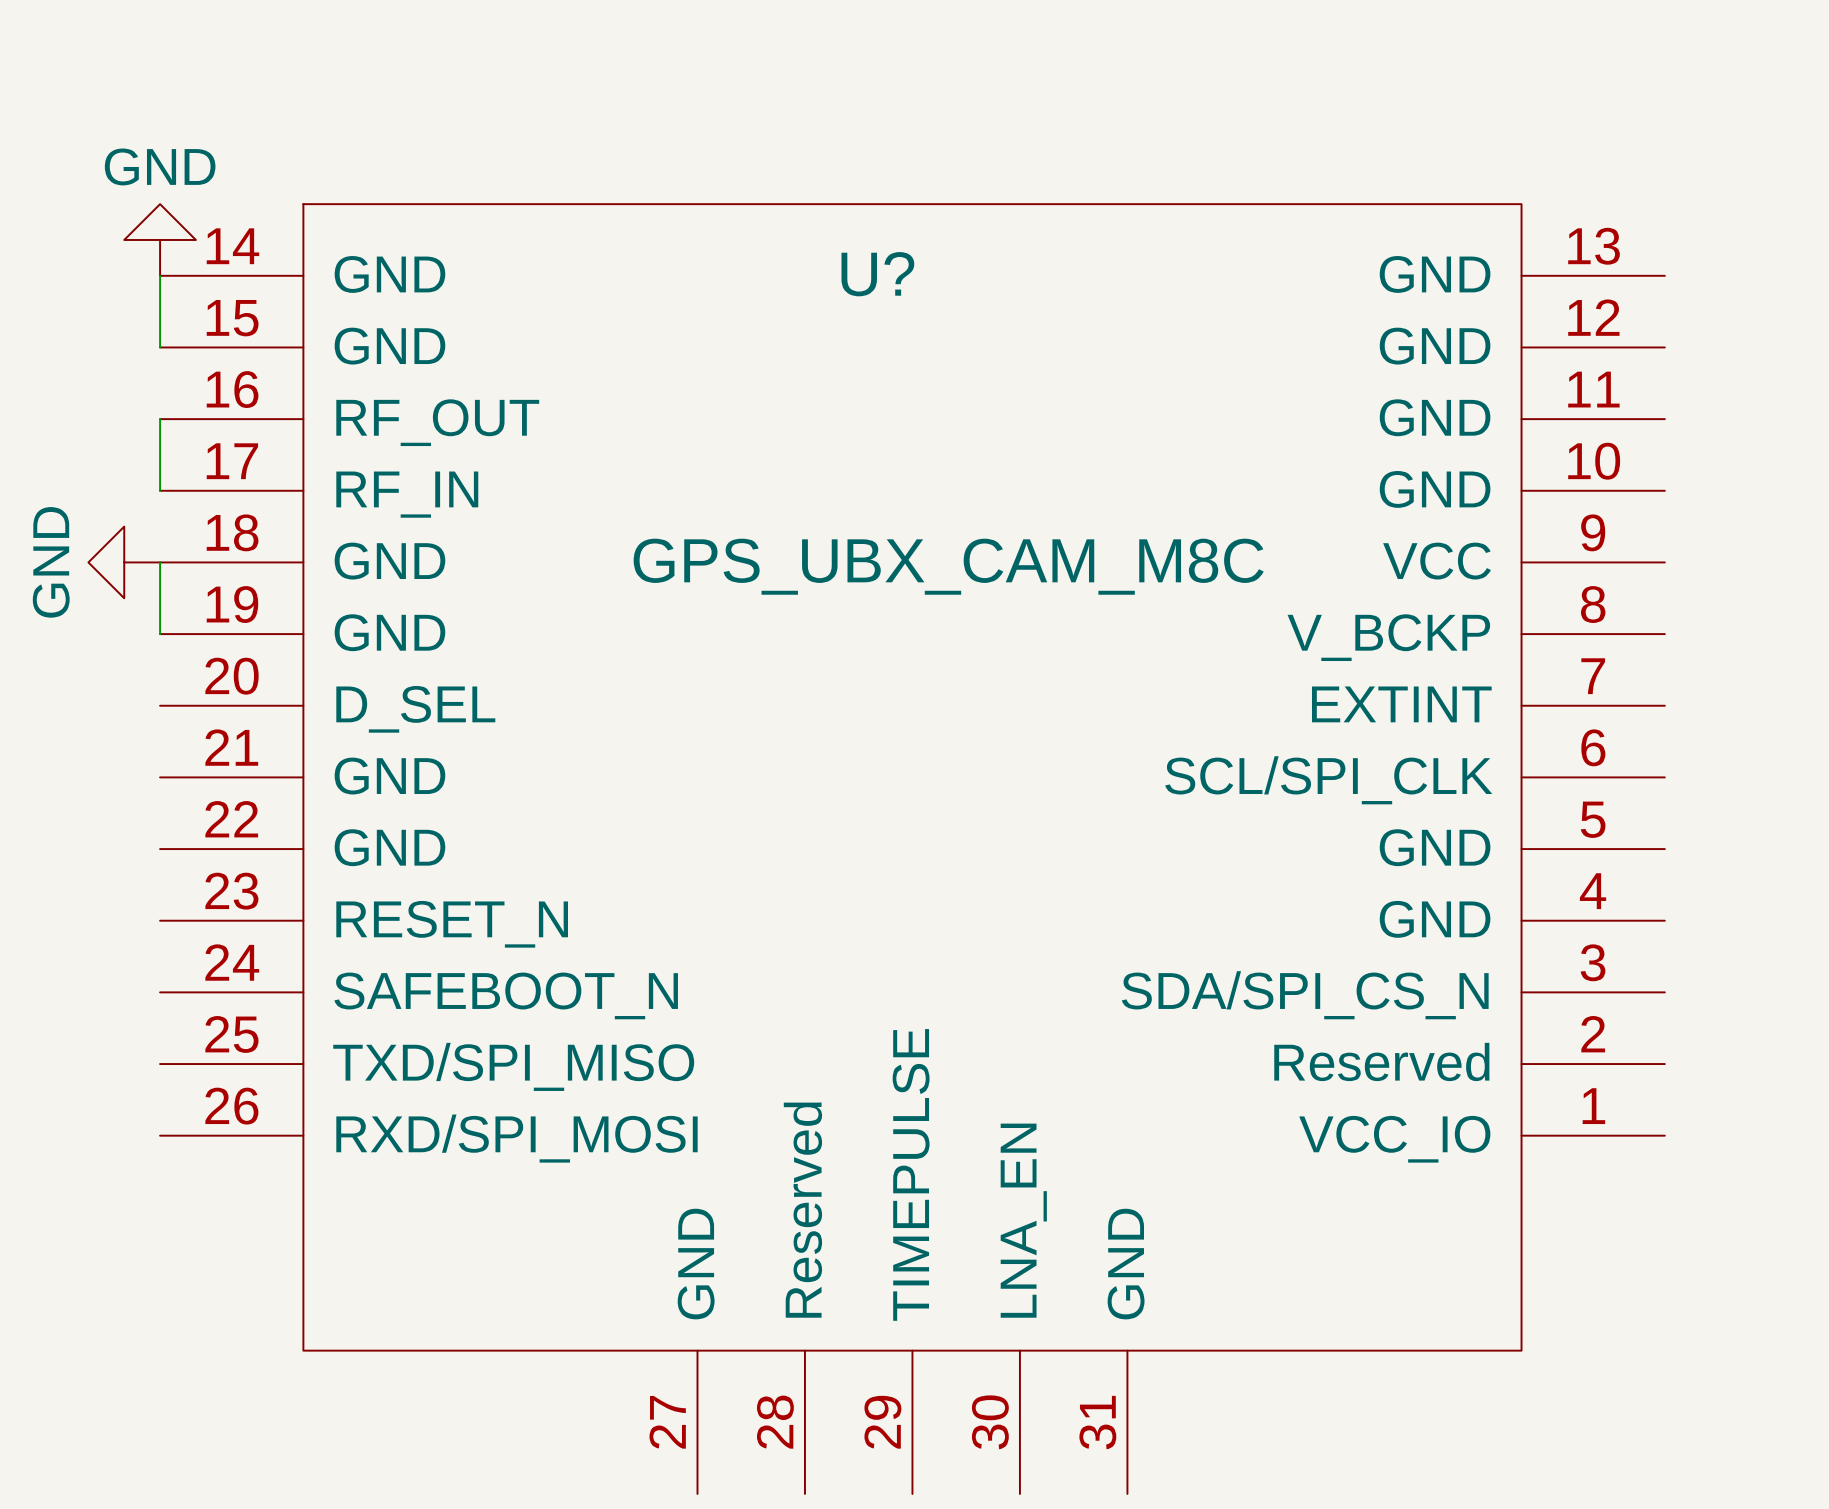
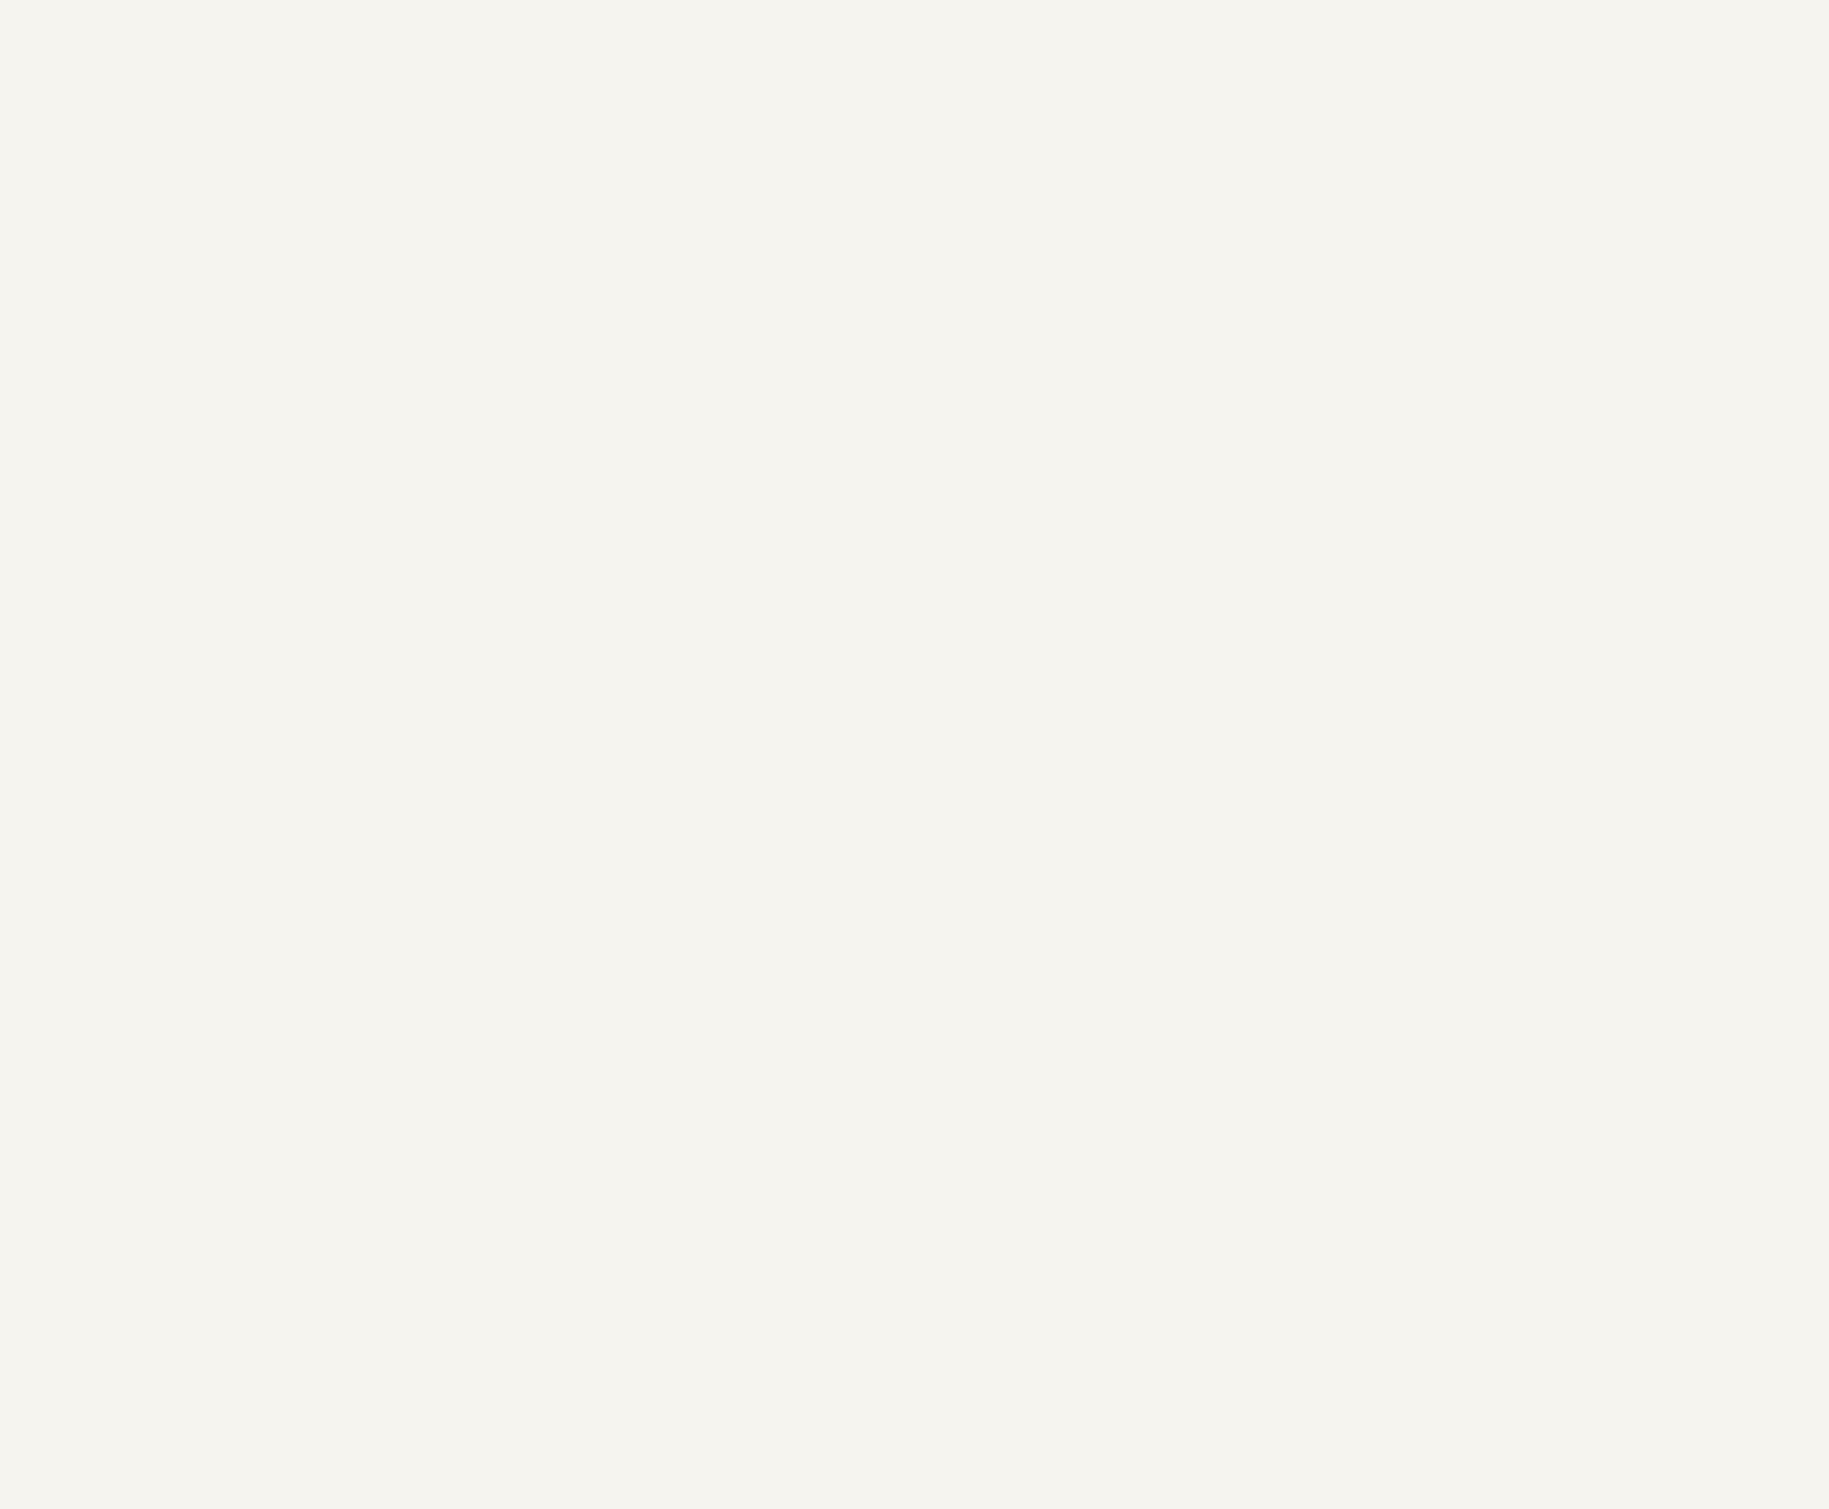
power symbol: GND (160, 239) -> none
wire: (160, 275) (160, 347) -> none
wire: (160, 419) (160, 490) -> none
power symbol: GND (124, 562) -> none
wire: (160, 562) (160, 634) -> none
U?: GPS_UBX_CAM_M8C (912, 849) -> none

